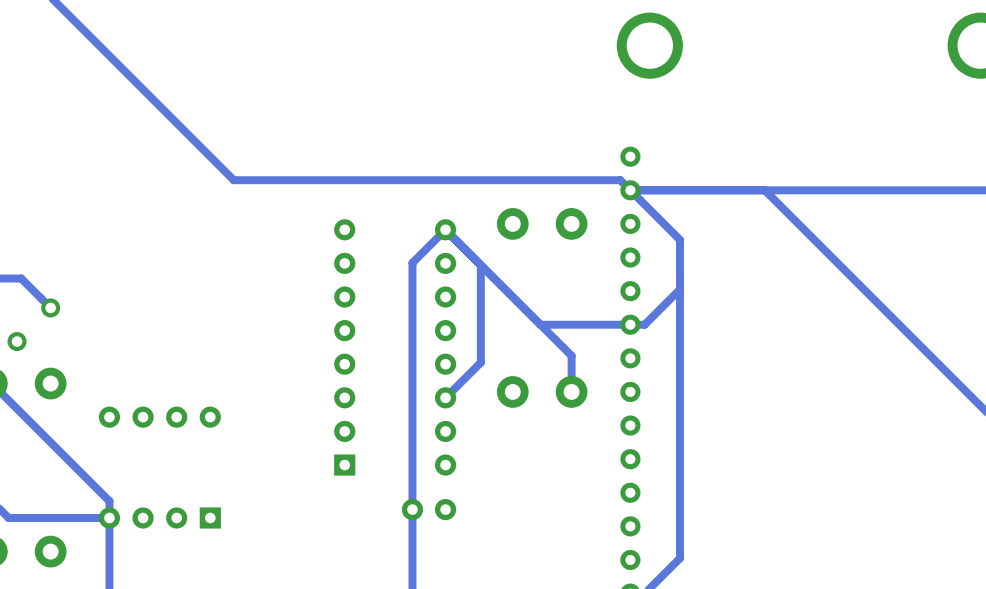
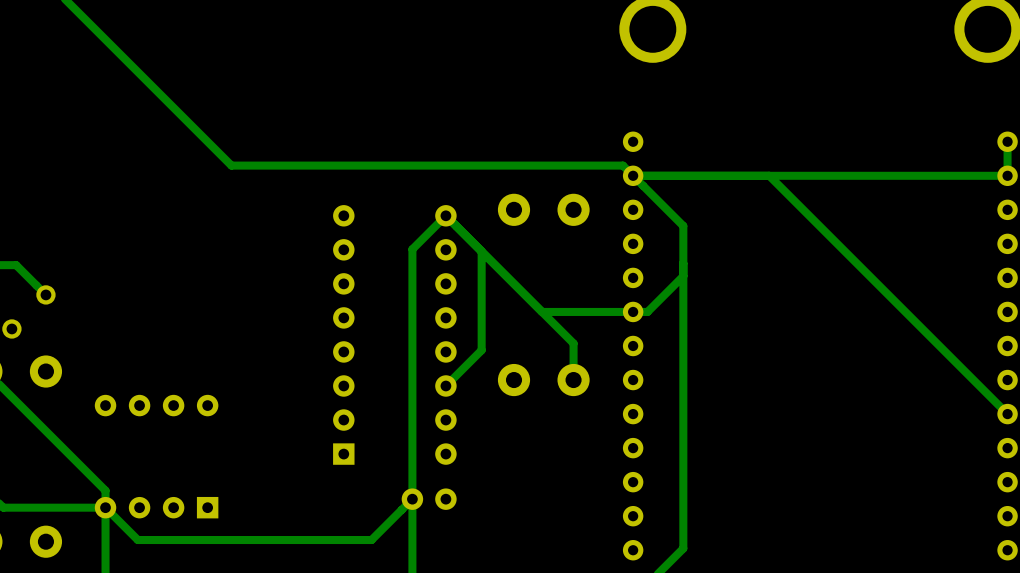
track: none -> (412, 499) (371, 540) (137, 540) (105, 507)

